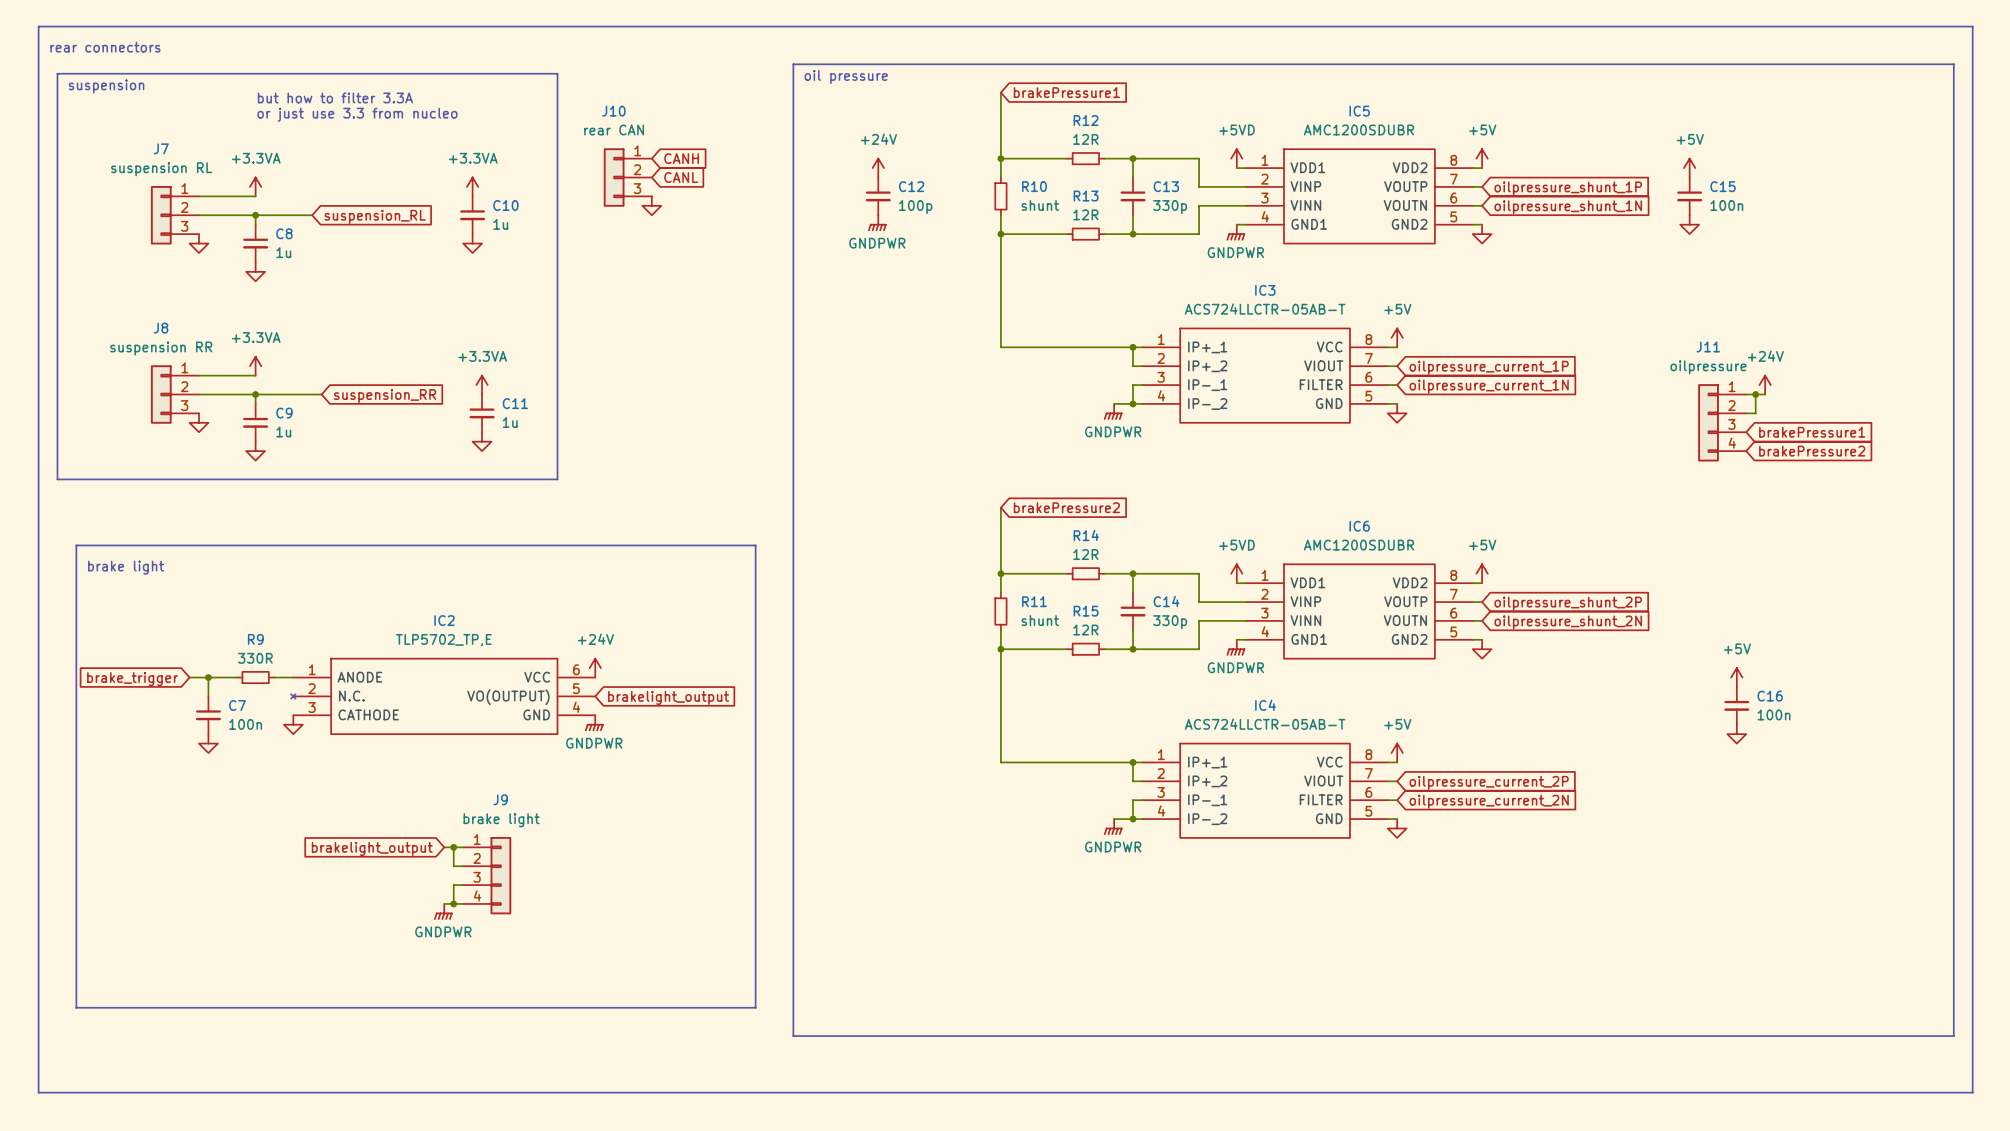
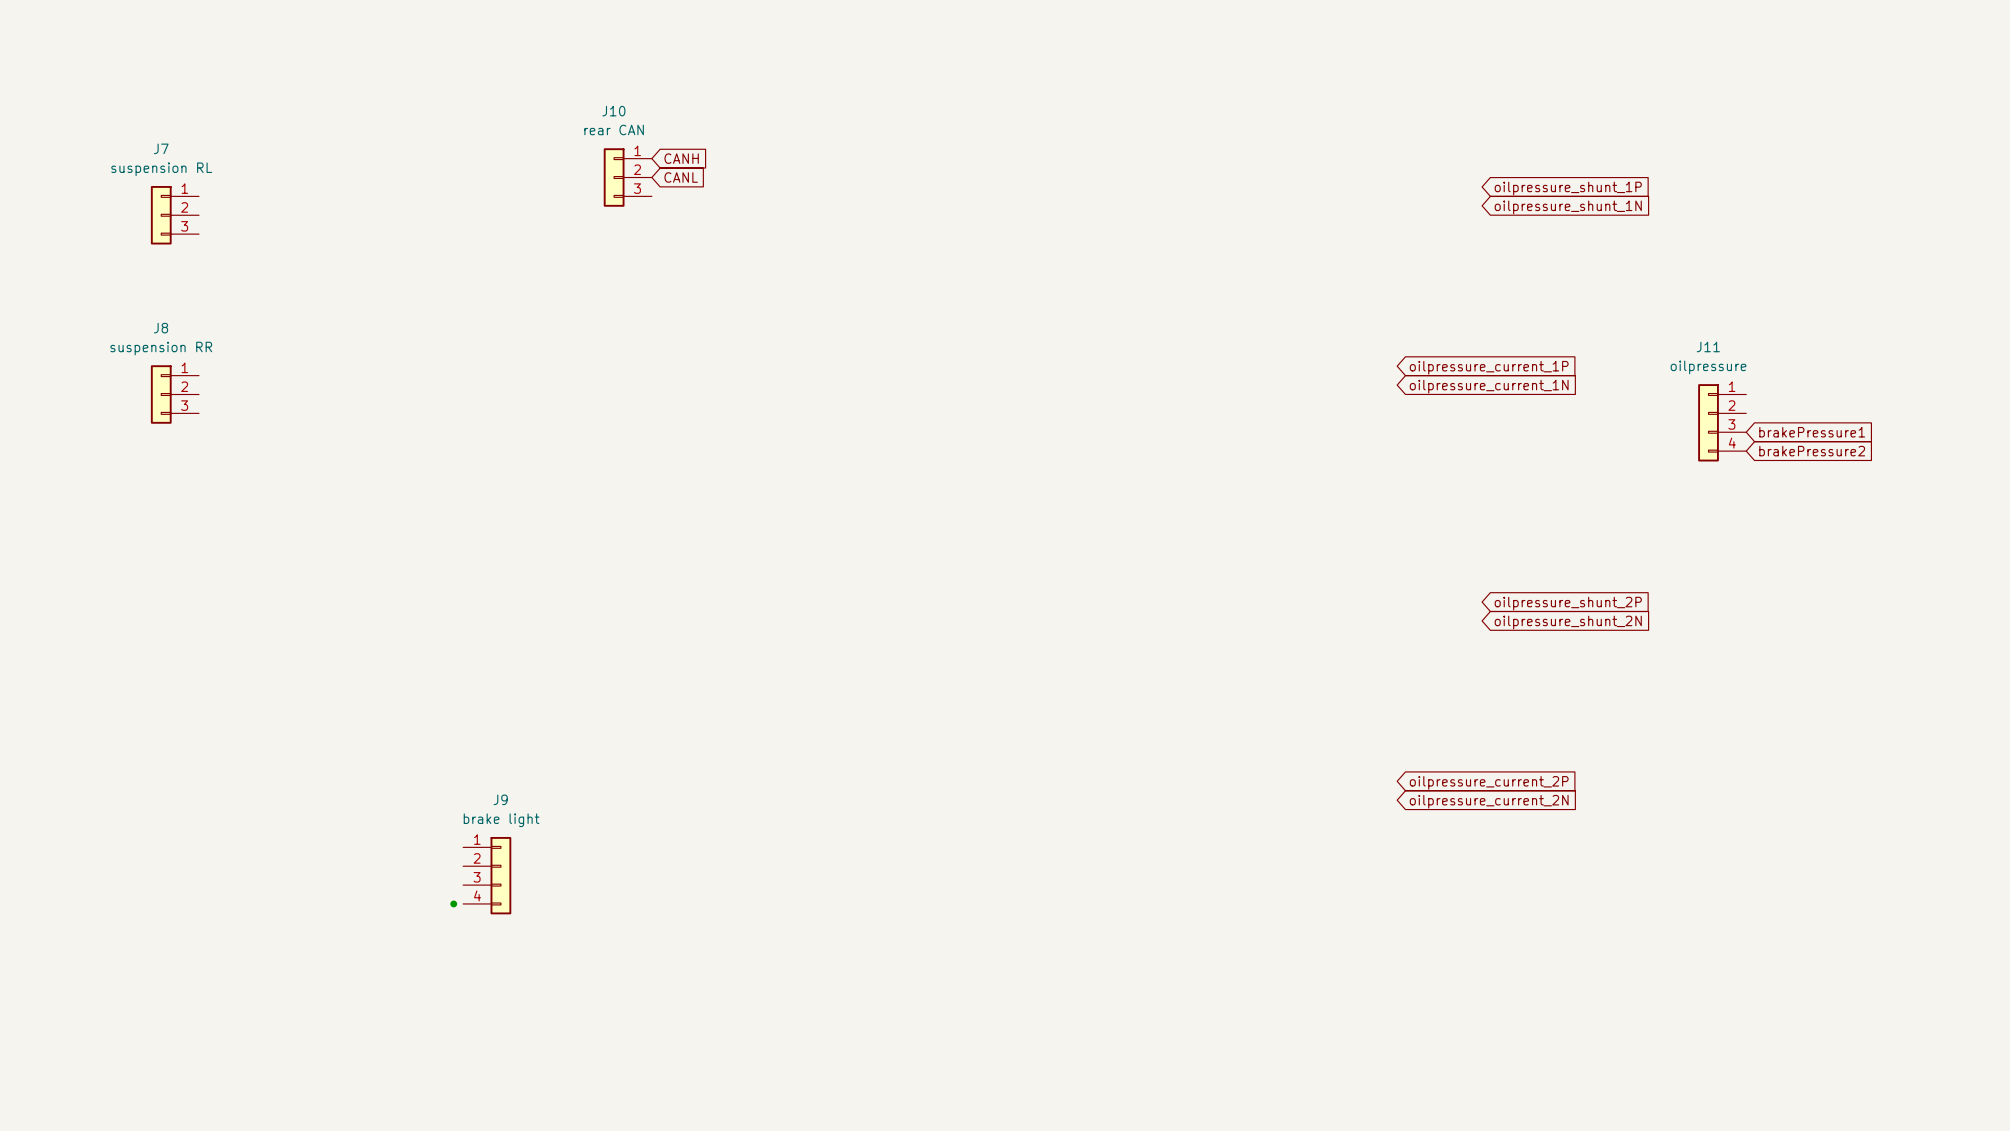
line: (38, 26) (1972, 26) (1972, 1092) (38, 1092) (38, 26) -> none
text: rear connectors (105, 47) -> none
line: (793, 64) (1953, 64) (1953, 1036) (793, 1036) (793, 64) -> none
line: (57, 73) (557, 73) (557, 479) (57, 479) (57, 73) -> none
text: oil pressure (846, 77) -> none
text: suspension (106, 86) -> none
wire: (1000, 92) (1000, 177) -> none
global label: brakePressure1 (1066, 92) -> none
text: but how to filter 3.3A (335, 97) -> none
text: or just use 3.3 from nucleo (357, 114) -> none
wire: (1000, 158) (1066, 158) -> none
junction: (1000, 158) -> none
R12: 12R (1085, 158) -> none
wire: (1104, 158) (1199, 158) (1199, 186) (1246, 186) -> none
wire: (1133, 158) (1133, 177) -> none
junction: (1133, 158) -> none
power symbol: +5VD (1236, 158) -> none
power symbol: +5V (1482, 158) -> none
power symbol: +24V (878, 168) -> none
wire: (1236, 168) (1246, 168) -> none
wire: (1472, 168) (1482, 168) -> none
power symbol: +5V (1689, 168) -> none
power symbol: +3.3VA (255, 186) -> none
power symbol: +3.3VA (472, 186) -> none
wire: (1472, 186) (1482, 186) -> none
wire: (199, 196) (255, 196) -> none
C12: 100p (878, 196) -> none
R10: shunt (1000, 196) -> none
C13: 330p (1133, 196) -> none
IC5: AMC1200SDUBR (1359, 196) -> none
C15: 100n (1689, 196) -> none
power symbol: (651, 205) -> none
wire: (1246, 205) (1199, 205) (1199, 234) (1104, 234) -> none
wire: (1472, 205) (1482, 205) -> none
wire: (199, 215) (312, 215) -> none
wire: (255, 215) (255, 224) -> none
junction: (255, 215) -> none
C10: 1u (472, 215) -> none
wire: (1000, 215) (1000, 347) (1142, 347) -> none
wire: (1133, 215) (1133, 234) -> none
global label: suspension_RL (375, 216) -> none
power symbol: GNDPWR (877, 223) -> none
wire: (1236, 224) (1246, 224) -> none
wire: (1472, 224) (1482, 224) -> none
power symbol: (1689, 224) -> none
power symbol: GNDPWR (1235, 232) -> none
wire: (1000, 234) (1066, 234) -> none
junction: (1000, 234) -> none
R13: 12R (1085, 234) -> none
junction: (1133, 234) -> none
power symbol: (1482, 234) -> none
power symbol: (199, 243) -> none
C8: 1u (255, 243) -> none
power symbol: (472, 243) -> none
power symbol: (255, 271) -> none
power symbol: +5V (1397, 337) -> none
wire: (1133, 347) (1133, 366) (1142, 366) -> none
junction: (1133, 347) -> none
wire: (1387, 347) (1397, 347) -> none
power symbol: +3.3VA (255, 366) -> none
wire: (1387, 366) (1397, 366) -> none
wire: (199, 375) (255, 375) -> none
IC3: ACS724LLCTR-05AB-T (1265, 375) -> none
power symbol: +3.3VA (482, 385) -> none
wire: (1142, 385) (1133, 385) (1133, 403) -> none
wire: (1387, 385) (1397, 385) -> none
power symbol: +24V (1765, 385) -> none
wire: (199, 394) (321, 394) -> none
wire: (255, 394) (255, 403) -> none
junction: (255, 394) -> none
wire: (1746, 394) (1765, 394) -> none
wire: (1755, 394) (1755, 413) (1746, 413) -> none
junction: (1755, 394) -> none
global label: suspension_RR (385, 396) -> none
wire: (1114, 403) (1142, 403) -> none
junction: (1133, 403) -> none
wire: (1387, 403) (1397, 403) -> none
power symbol: GNDPWR (1113, 411) -> none
C11: 1u (482, 413) -> none
power symbol: (1397, 413) -> none
power symbol: (199, 422) -> none
C9: 1u (255, 422) -> none
power symbol: (482, 441) -> none
power symbol: (255, 451) -> none
wire: (1000, 507) (1000, 592) -> none
global label: brakePressure2 (1066, 507) -> none
line: (76, 545) (755, 545) (755, 1007) (76, 1007) (76, 545) -> none
text: brake light (126, 567) -> none
wire: (1000, 573) (1066, 573) -> none
junction: (1000, 573) -> none
R14: 12R (1085, 573) -> none
wire: (1104, 573) (1199, 573) (1199, 602) (1246, 602) -> none
wire: (1133, 573) (1133, 592) -> none
junction: (1133, 573) -> none
power symbol: +5VD (1236, 573) -> none
power symbol: +5V (1482, 573) -> none
wire: (1236, 583) (1246, 583) -> none
wire: (1472, 583) (1482, 583) -> none
wire: (1472, 602) (1482, 602) -> none
R11: shunt (1000, 611) -> none
C14: 330p (1133, 611) -> none
IC6: AMC1200SDUBR (1359, 611) -> none
wire: (1246, 620) (1199, 620) (1199, 649) (1104, 649) -> none
wire: (1472, 620) (1482, 620) -> none
wire: (1000, 630) (1000, 762) (1142, 762) -> none
wire: (1133, 630) (1133, 649) -> none
wire: (1236, 639) (1246, 639) -> none
wire: (1472, 639) (1482, 639) -> none
power symbol: GNDPWR (1235, 647) -> none
wire: (1000, 649) (1066, 649) -> none
junction: (1000, 649) -> none
R15: 12R (1085, 649) -> none
junction: (1133, 649) -> none
power symbol: (1482, 649) -> none
power symbol: +24V (595, 668) -> none
wire: (189, 677) (236, 677) -> none
wire: (208, 677) (208, 696) -> none
junction: (208, 677) -> none
R9: 330R (255, 677) -> none
wire: (274, 677) (293, 677) -> none
power symbol: +5V (1736, 677) -> none
global label: brake_trigger (132, 679) -> none
IC2: TLP5702_TP,E (443, 696) -> none
global label: brakelight_output (668, 697) -> none
C16: 100n (1736, 705) -> none
C7: 100n (208, 715) -> none
power symbol: GNDPWR (594, 723) -> none
power symbol: (293, 724) -> none
power symbol: (1736, 734) -> none
power symbol: (208, 743) -> none
power symbol: +5V (1397, 753) -> none
wire: (1133, 762) (1133, 781) (1142, 781) -> none
junction: (1133, 762) -> none
wire: (1387, 762) (1397, 762) -> none
wire: (1387, 781) (1397, 781) -> none
IC4: ACS724LLCTR-05AB-T (1265, 790) -> none
wire: (1142, 800) (1133, 800) (1133, 819) -> none
wire: (1387, 800) (1397, 800) -> none
wire: (1114, 819) (1142, 819) -> none
junction: (1133, 819) -> none
wire: (1387, 819) (1397, 819) -> none
power symbol: GNDPWR (1113, 826) -> none
power symbol: (1397, 828) -> none
wire: (444, 847) (463, 847) -> none
wire: (453, 847) (453, 866) (463, 866) -> none
junction: (453, 847) -> none
global label: brakelight_output (372, 848) -> none
wire: (463, 885) (453, 885) (453, 903) -> none
wire: (444, 903) (463, 903) -> none
power symbol: GNDPWR (443, 911) -> none

